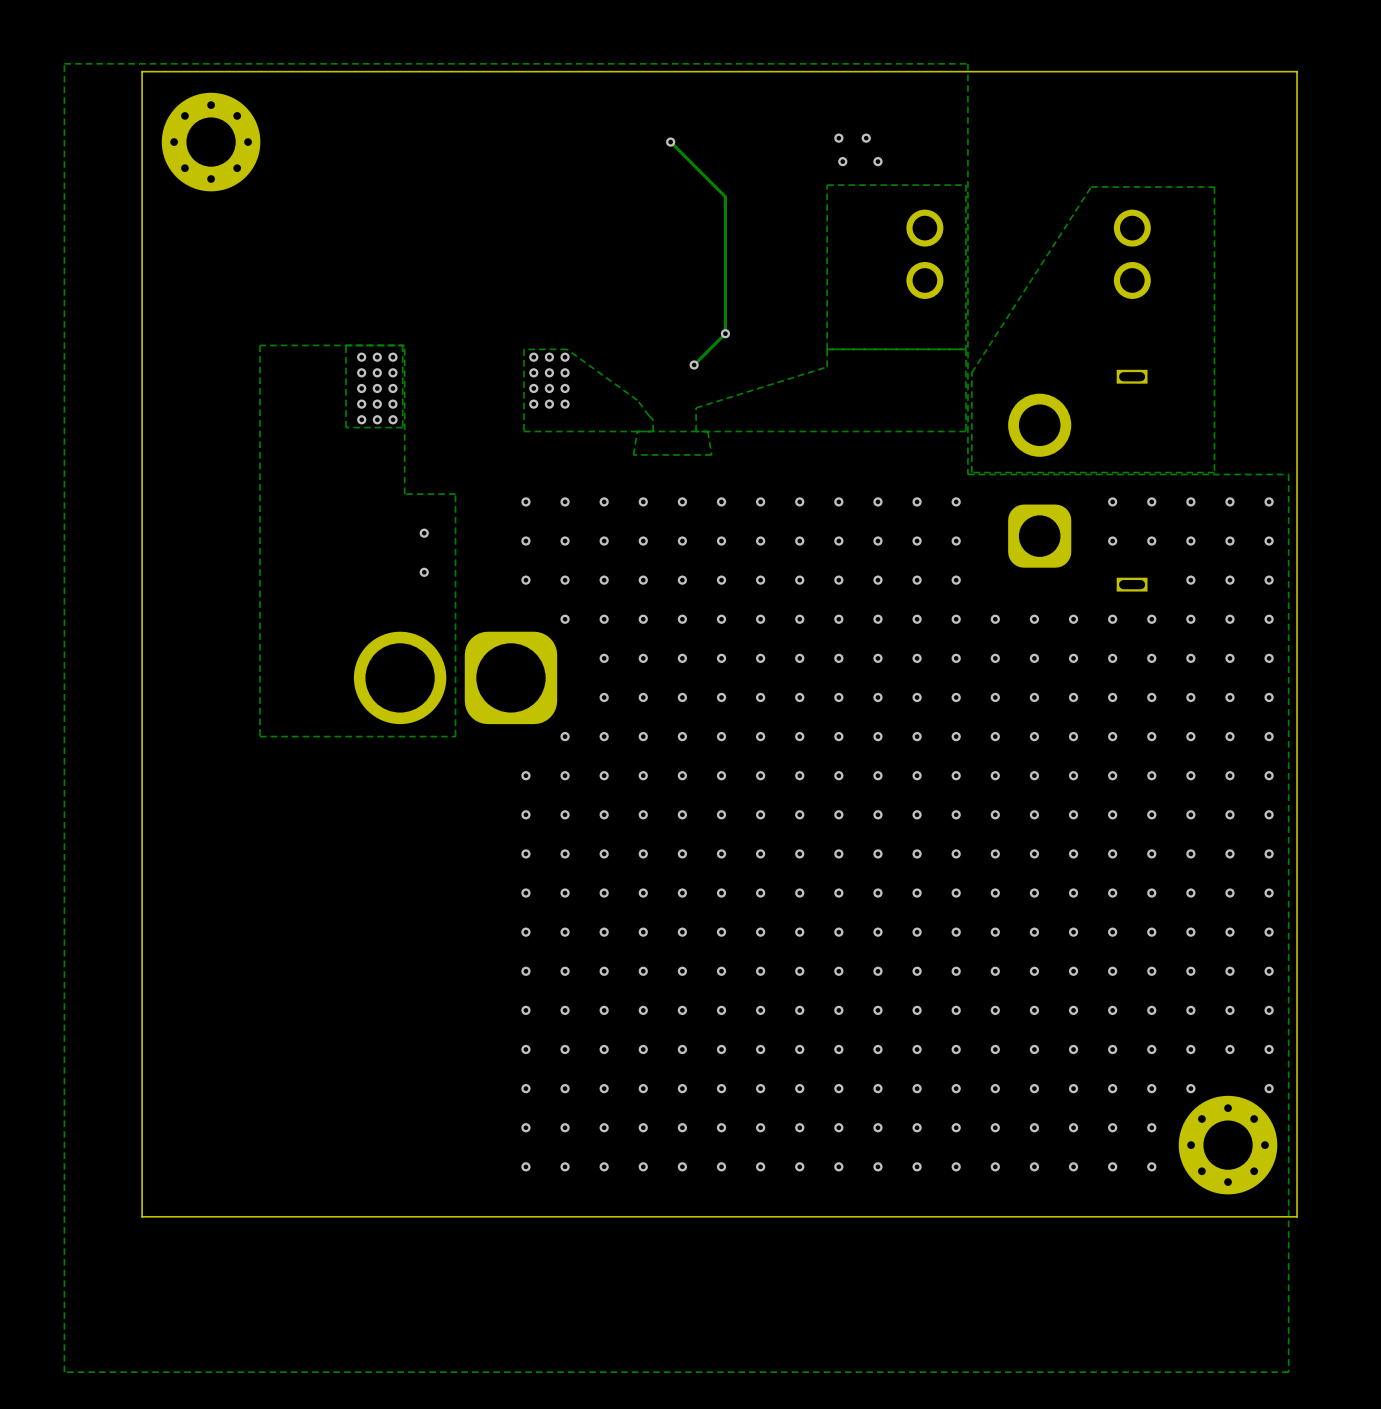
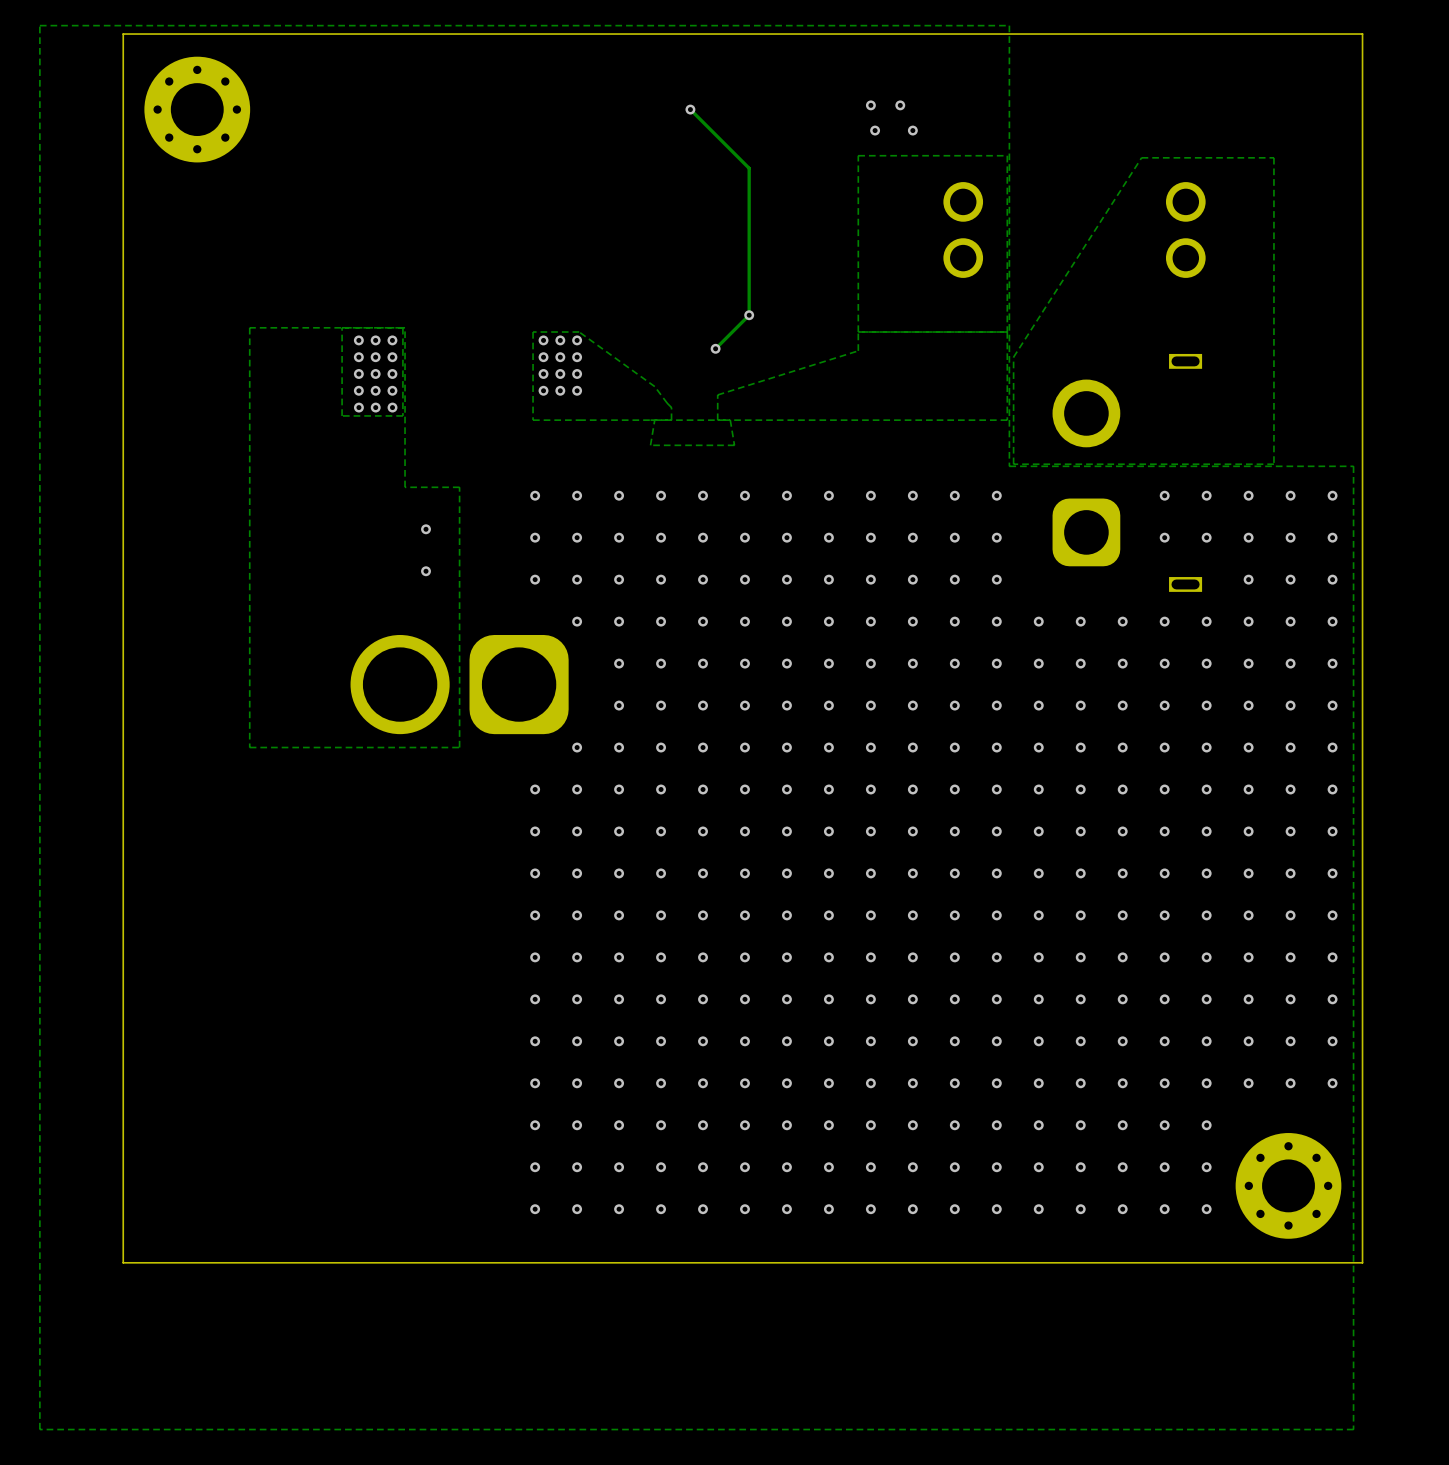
via: (1190, 1088) -> none
via: (1269, 1088) -> none

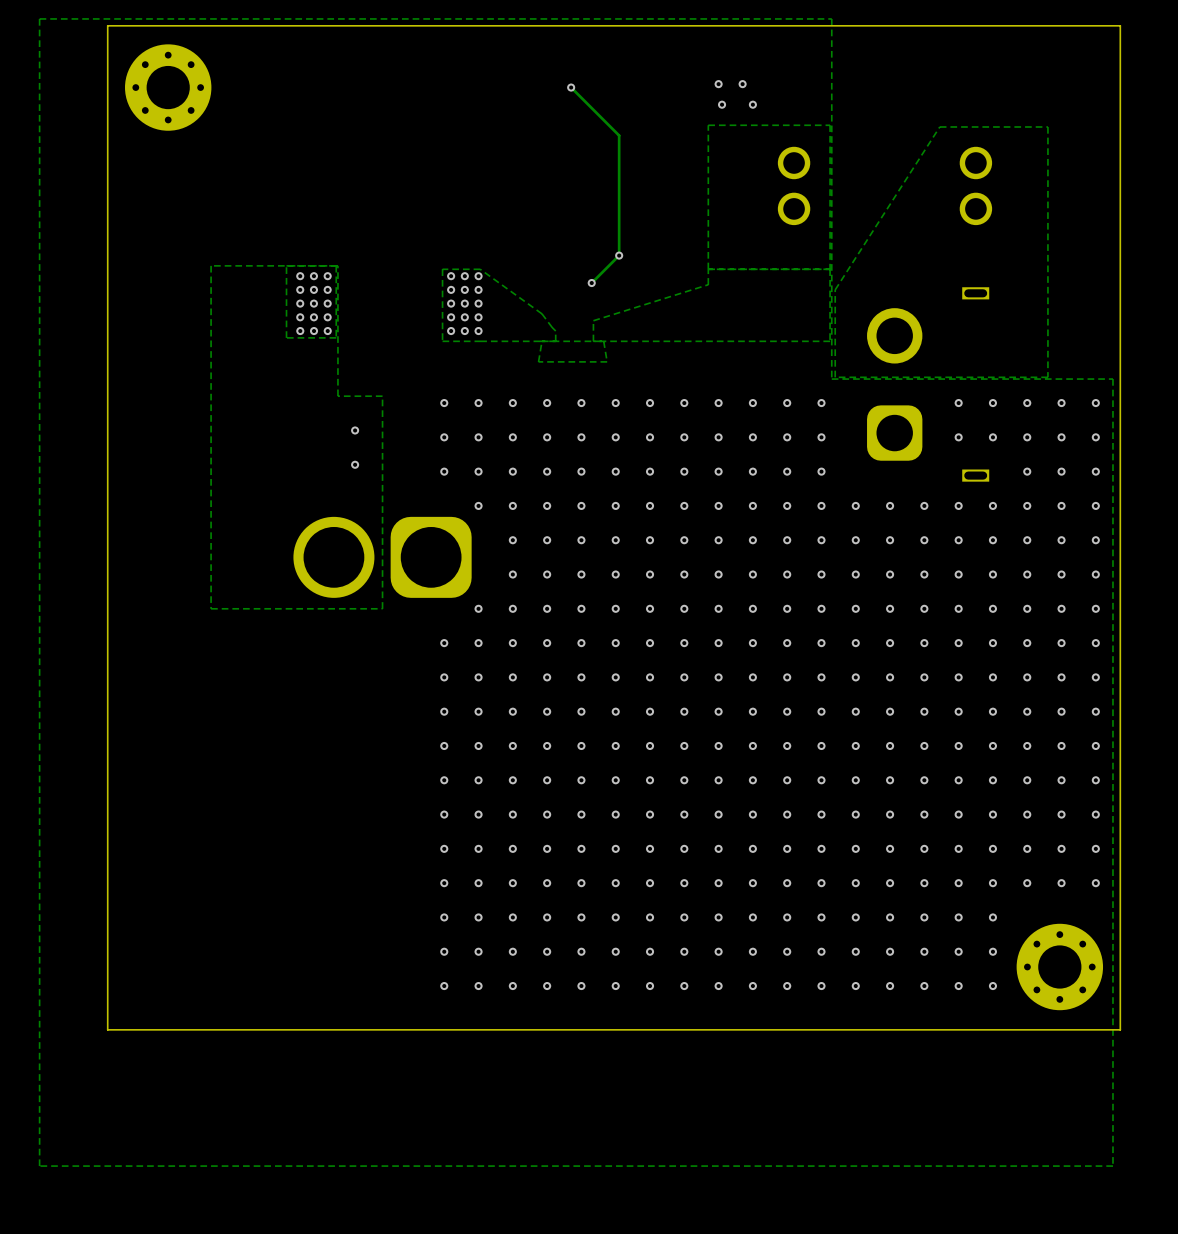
via: none -> (451, 331)
via: none -> (464, 331)
via: none -> (478, 331)

